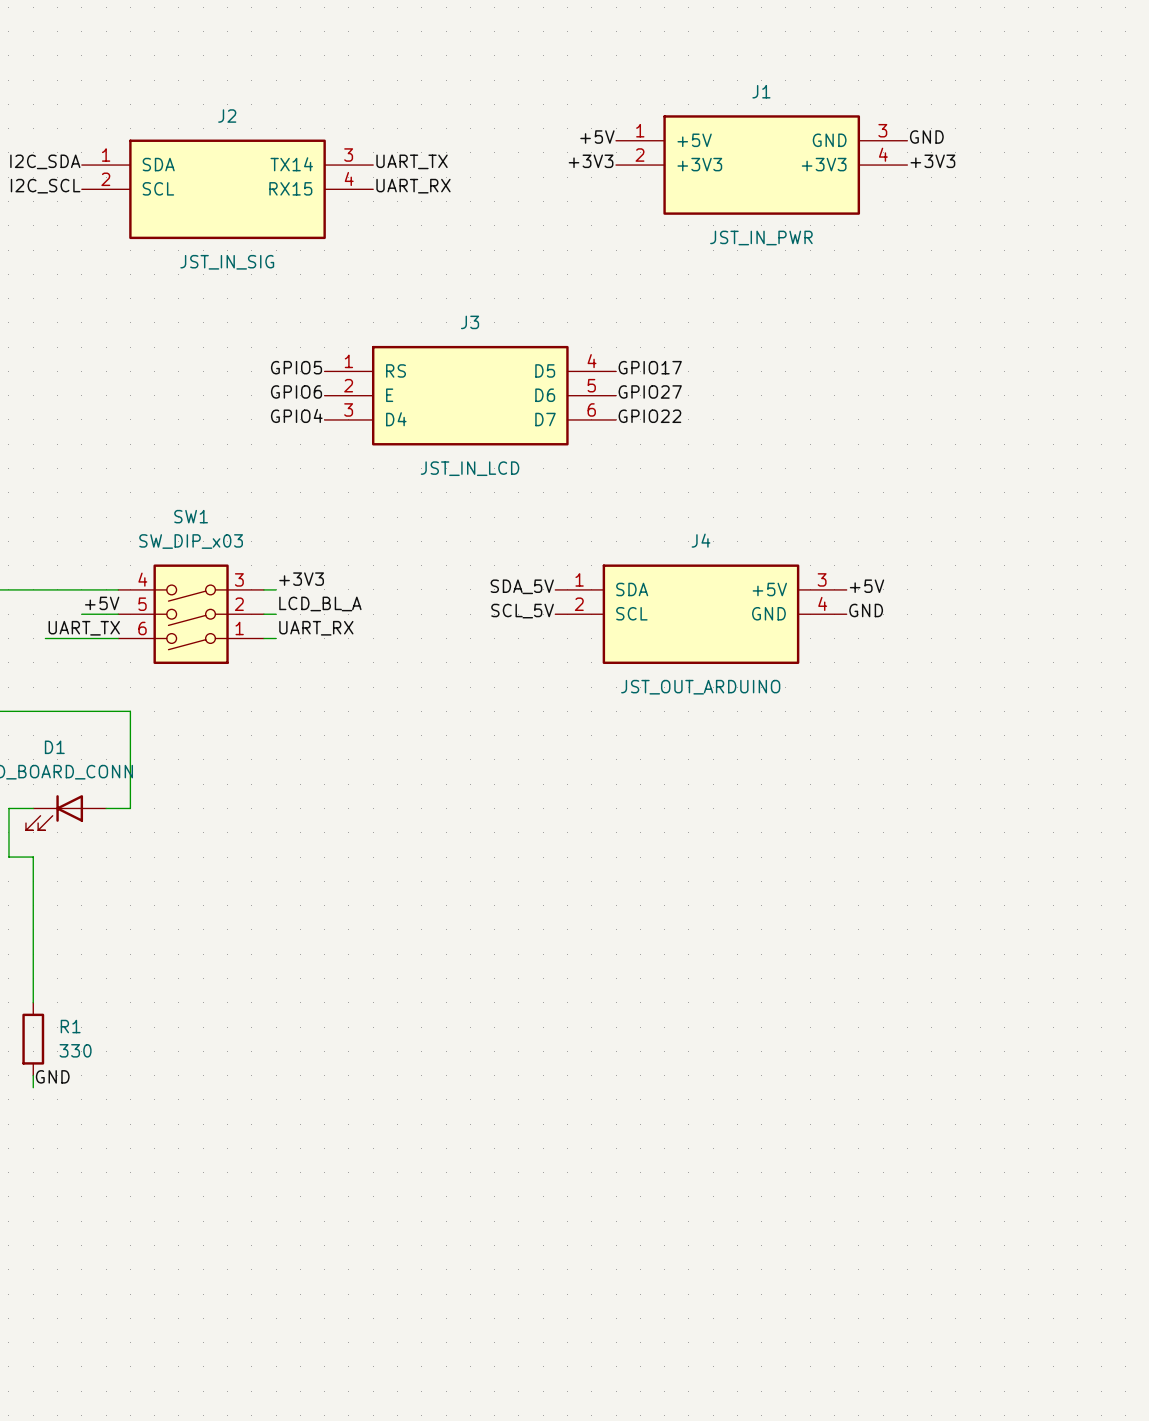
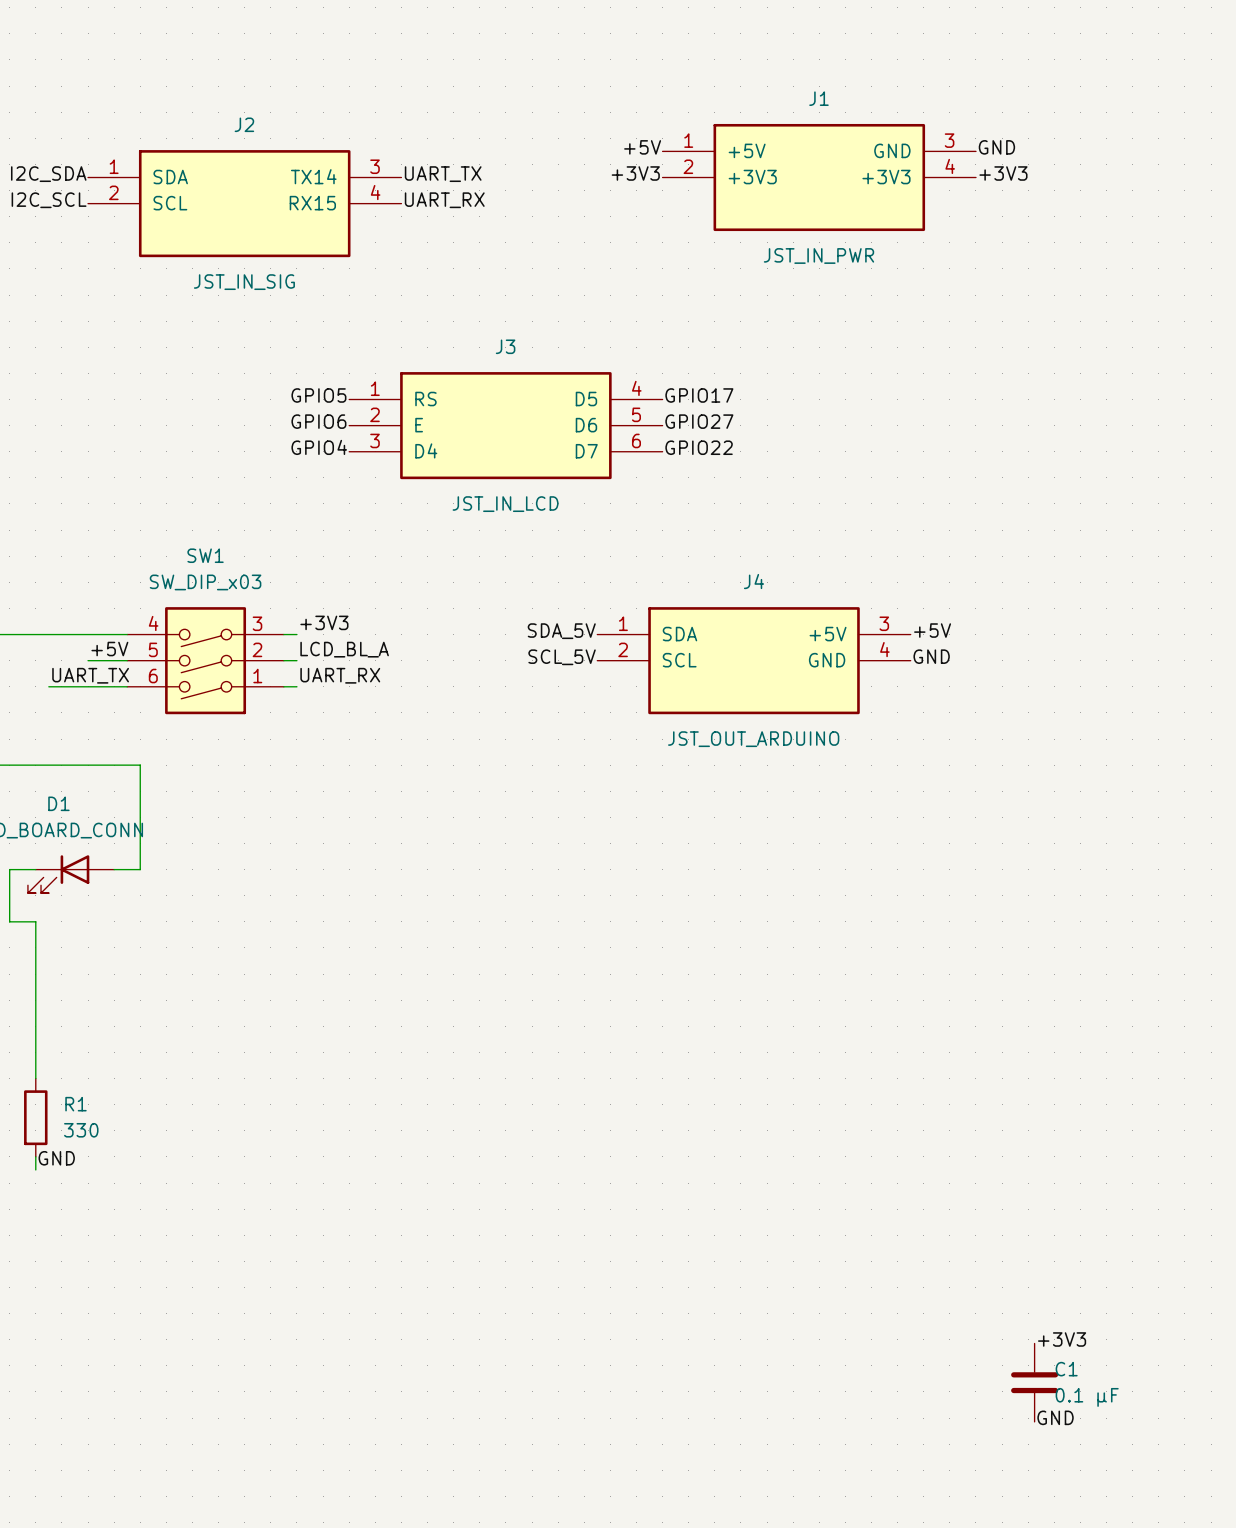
label: none -> +3V3 (1062, 1339)
C1: none -> 0.1 µF (1034, 1382)
label: none -> GND (1055, 1417)

